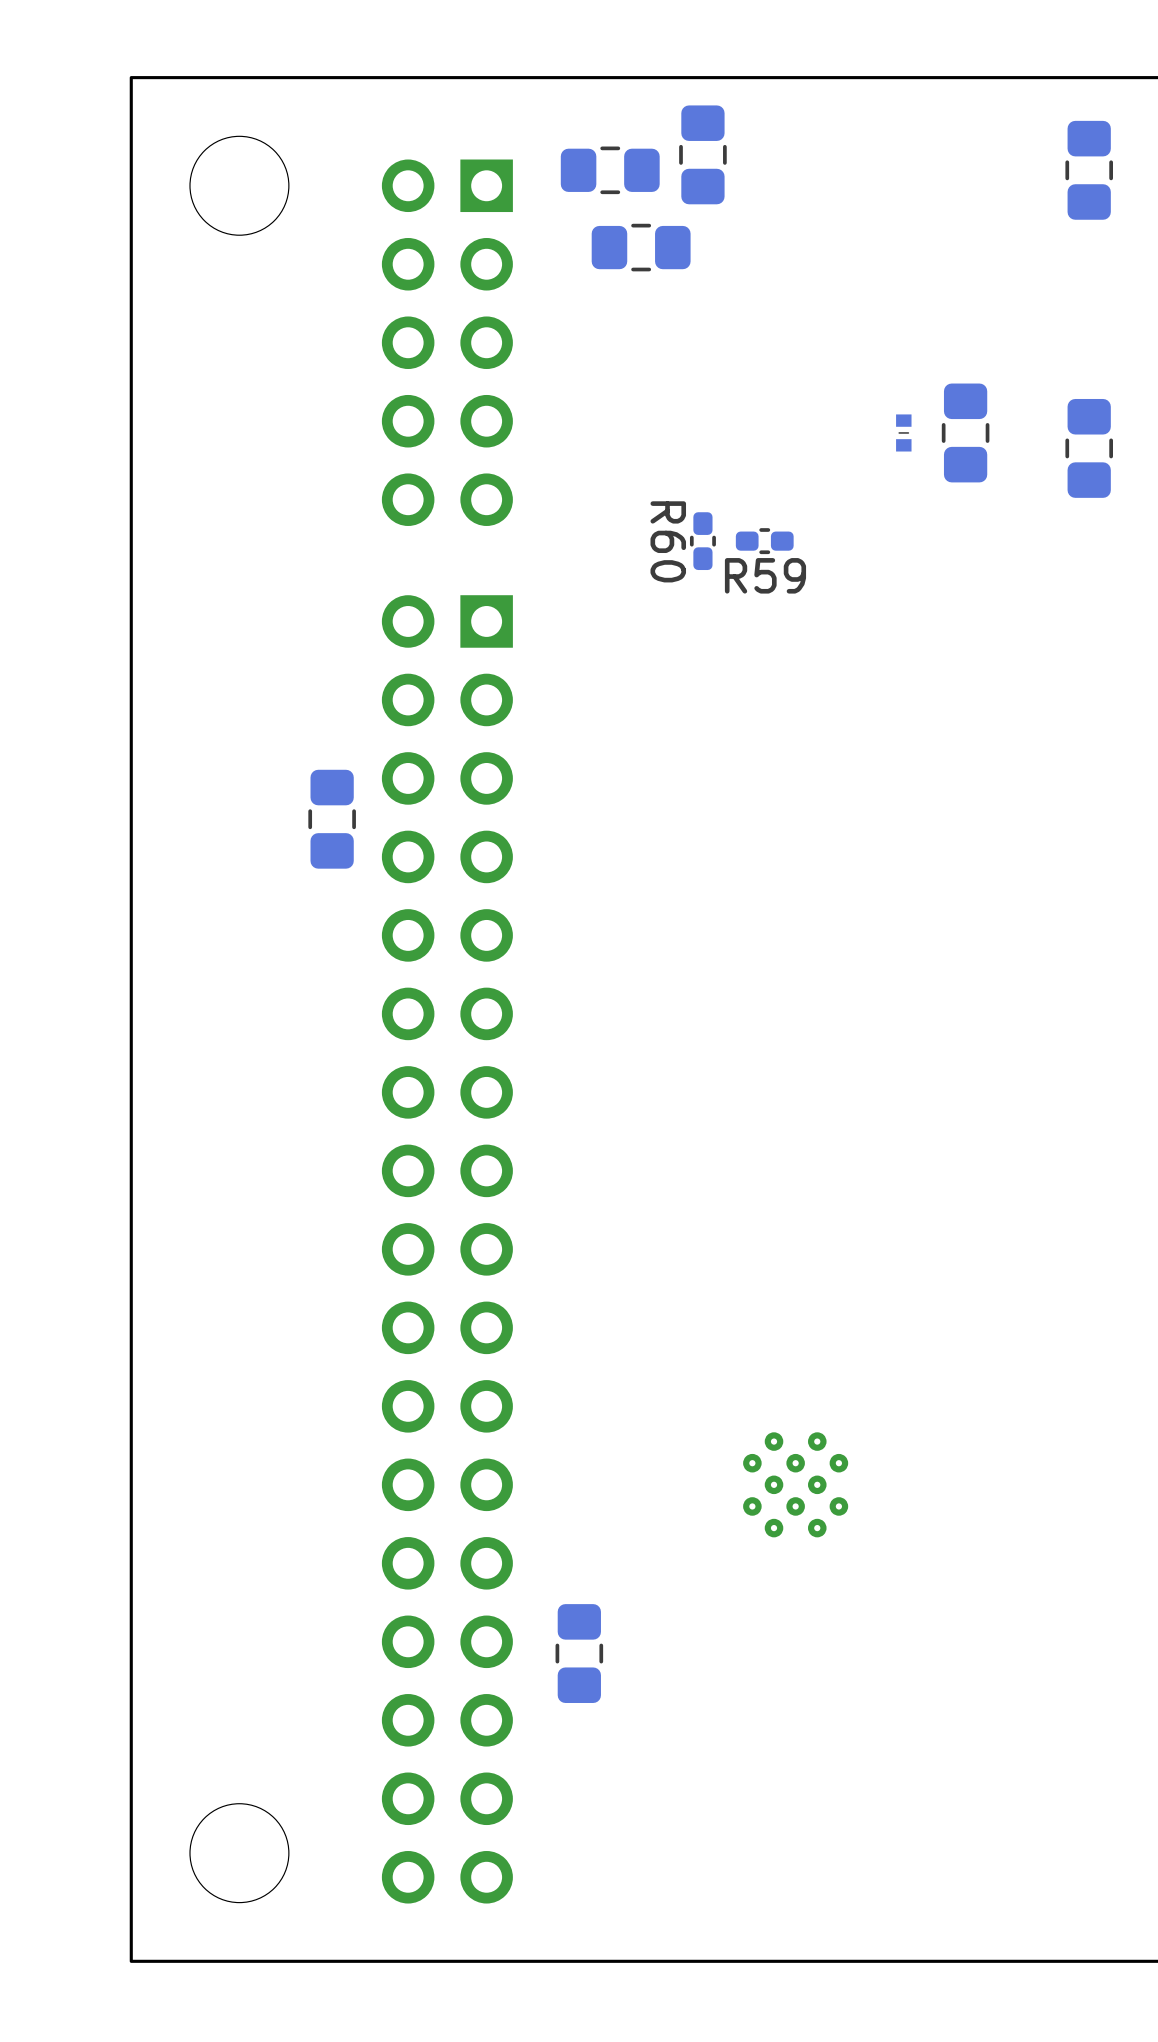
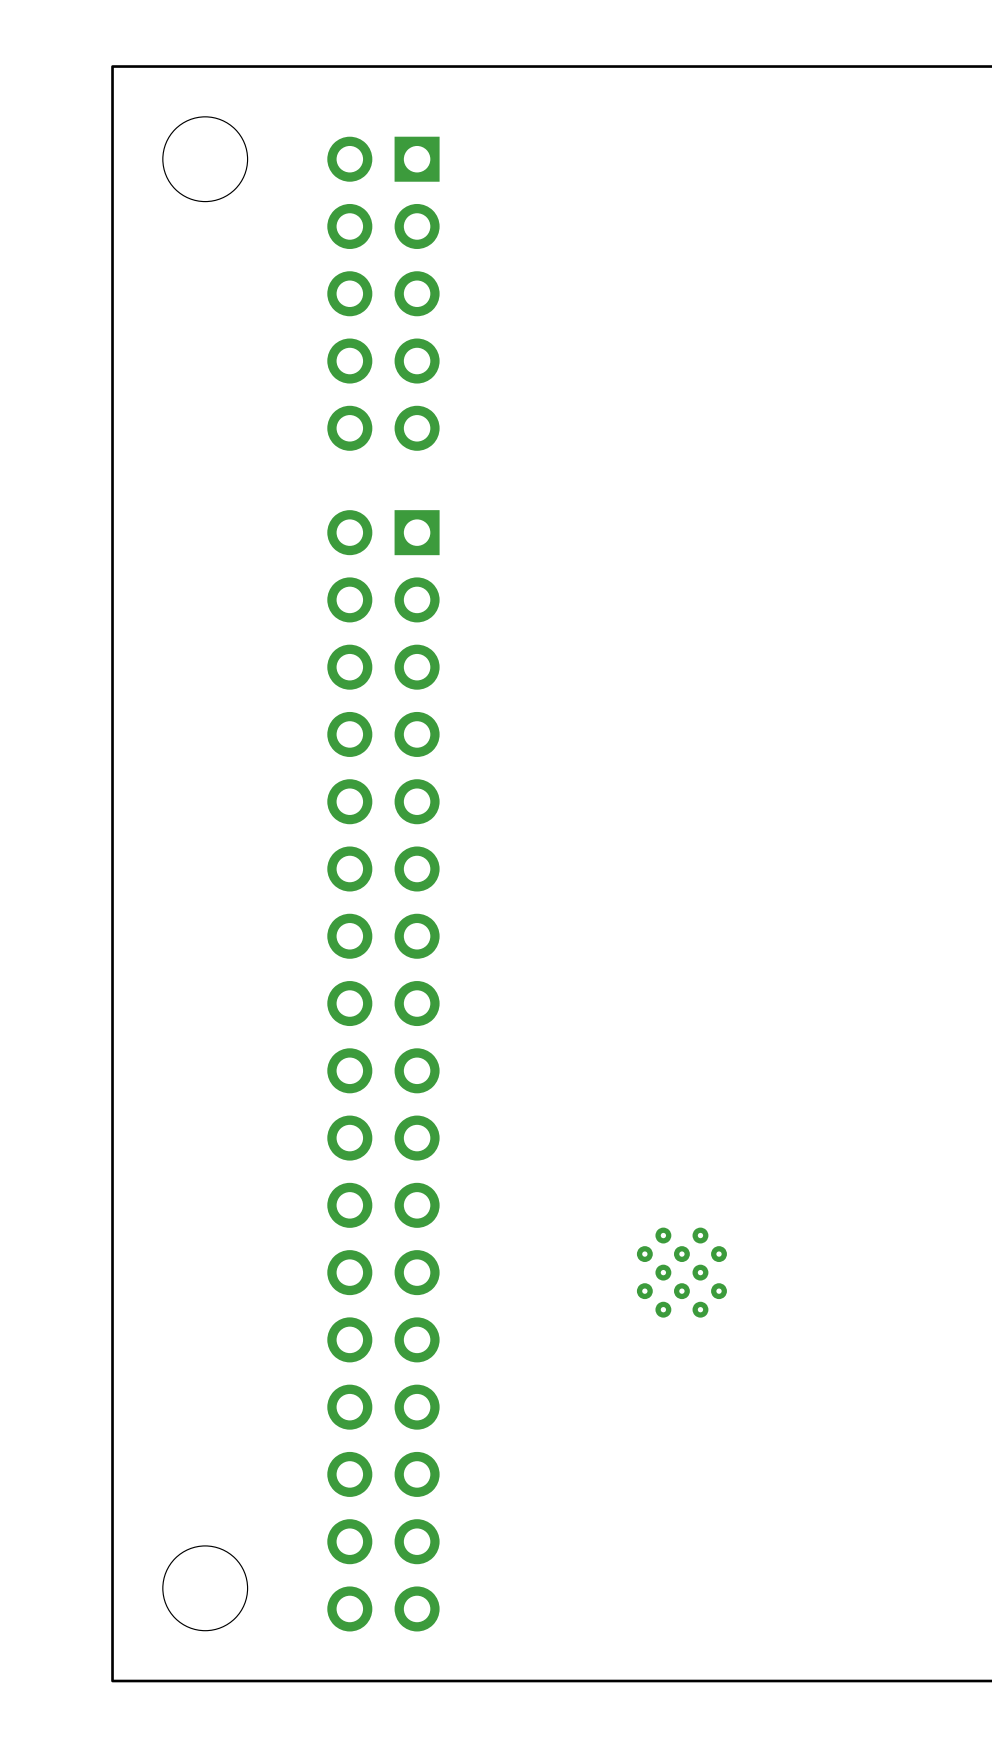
part: (702, 154) -> none
part: (610, 170) -> none
part: (1089, 170) -> none
part: (641, 247) -> none
part: (903, 432) -> none
part: (965, 432) -> none
part: (1089, 448) -> none
R60: (702, 541) -> none
R59: (764, 541) -> none
part: (332, 819) -> none
part: (579, 1653) -> none

